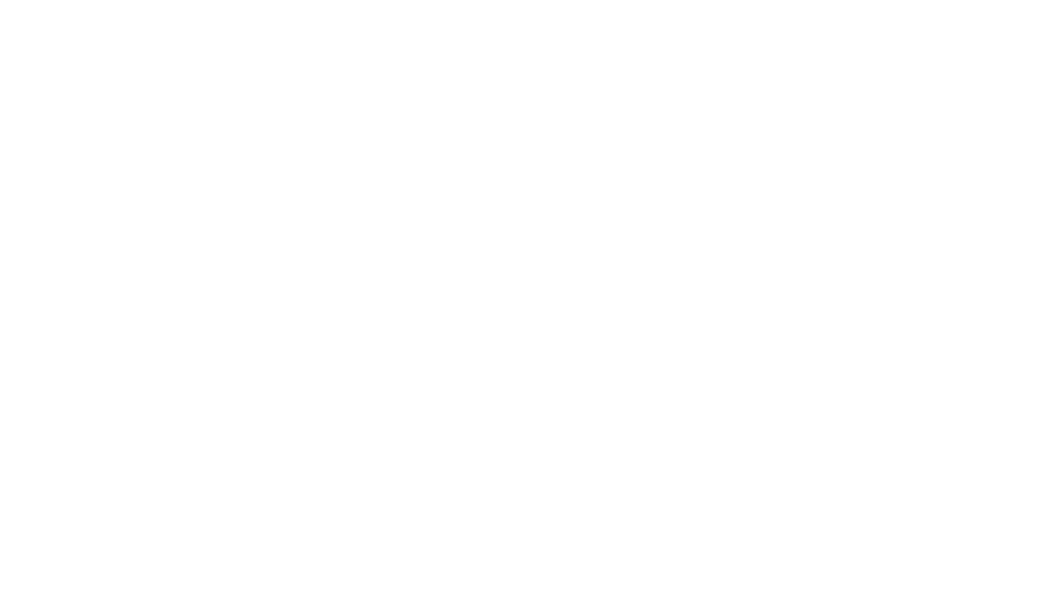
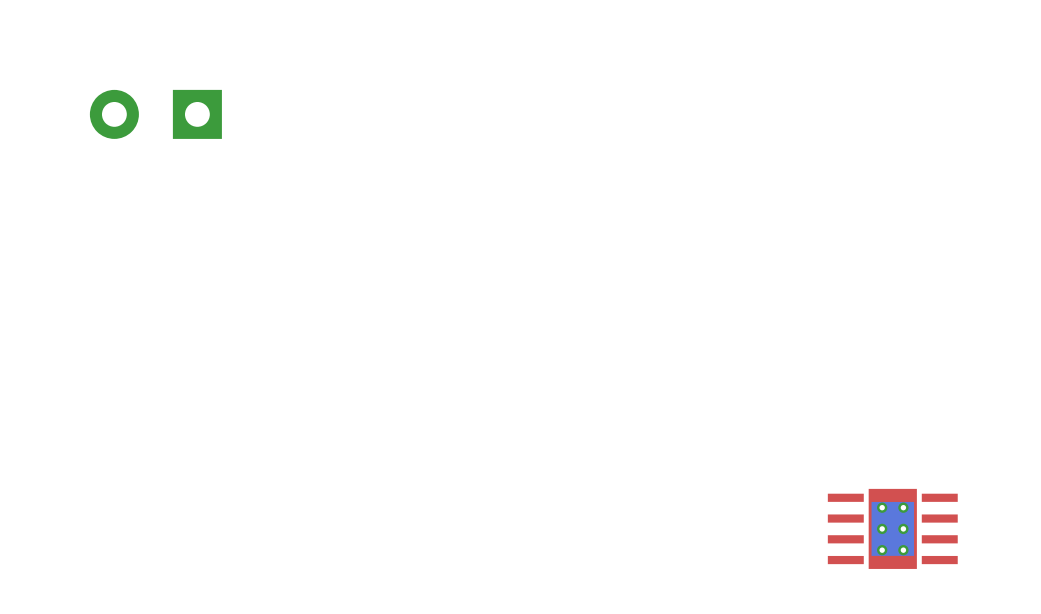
part: none -> (155, 114)
part: none -> (892, 528)

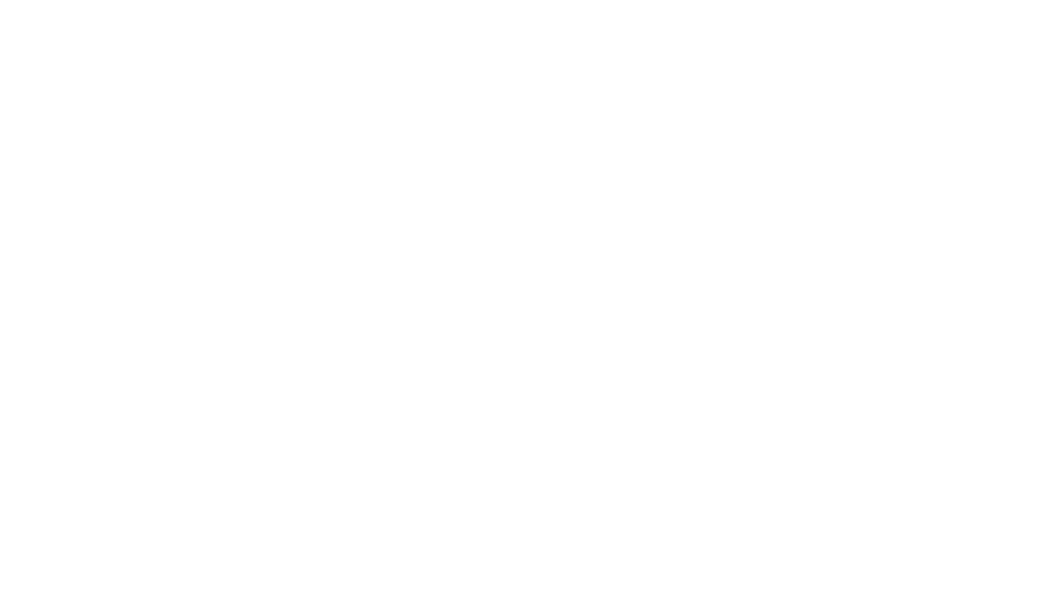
part: (155, 114) -> none
part: (892, 528) -> none

